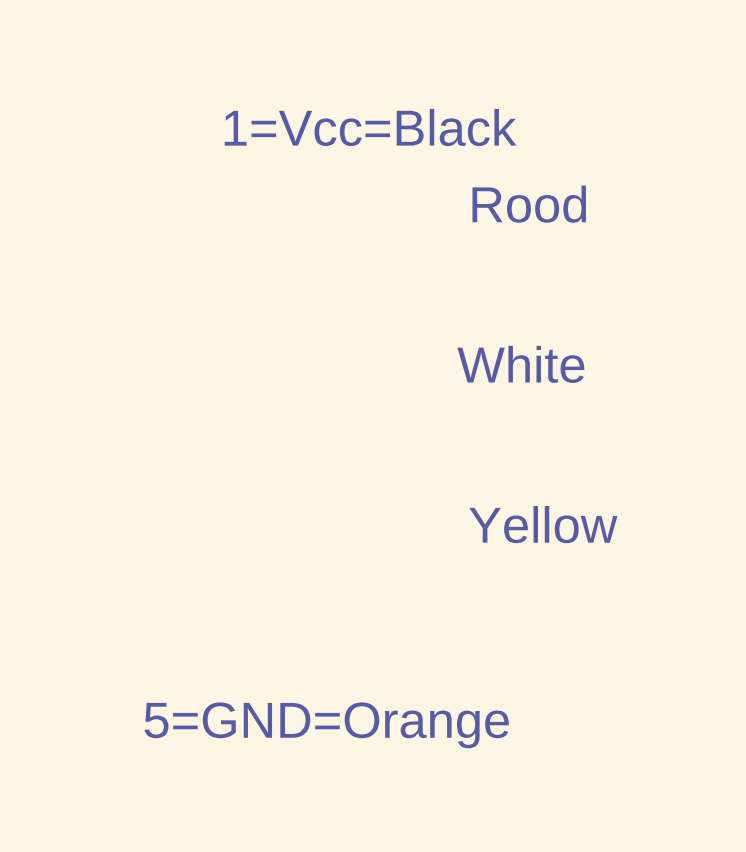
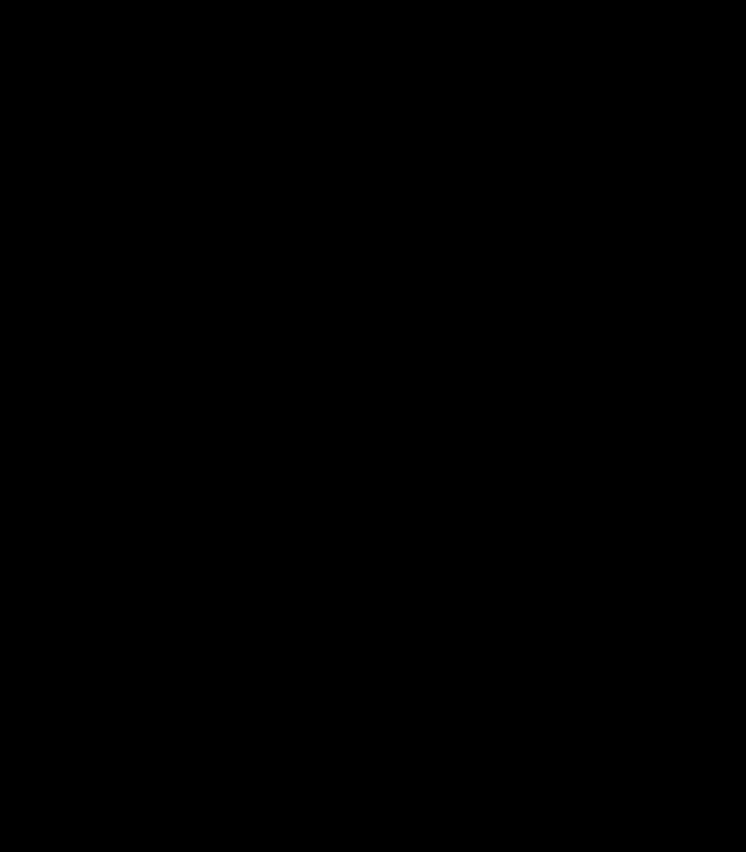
text: 1=Vcc=Black (370, 127) -> none
text: Rood (529, 204) -> none
text: White (520, 364) -> none
text: Yellow (543, 524) -> none
text: 5=GND=Orange (326, 725) -> none

